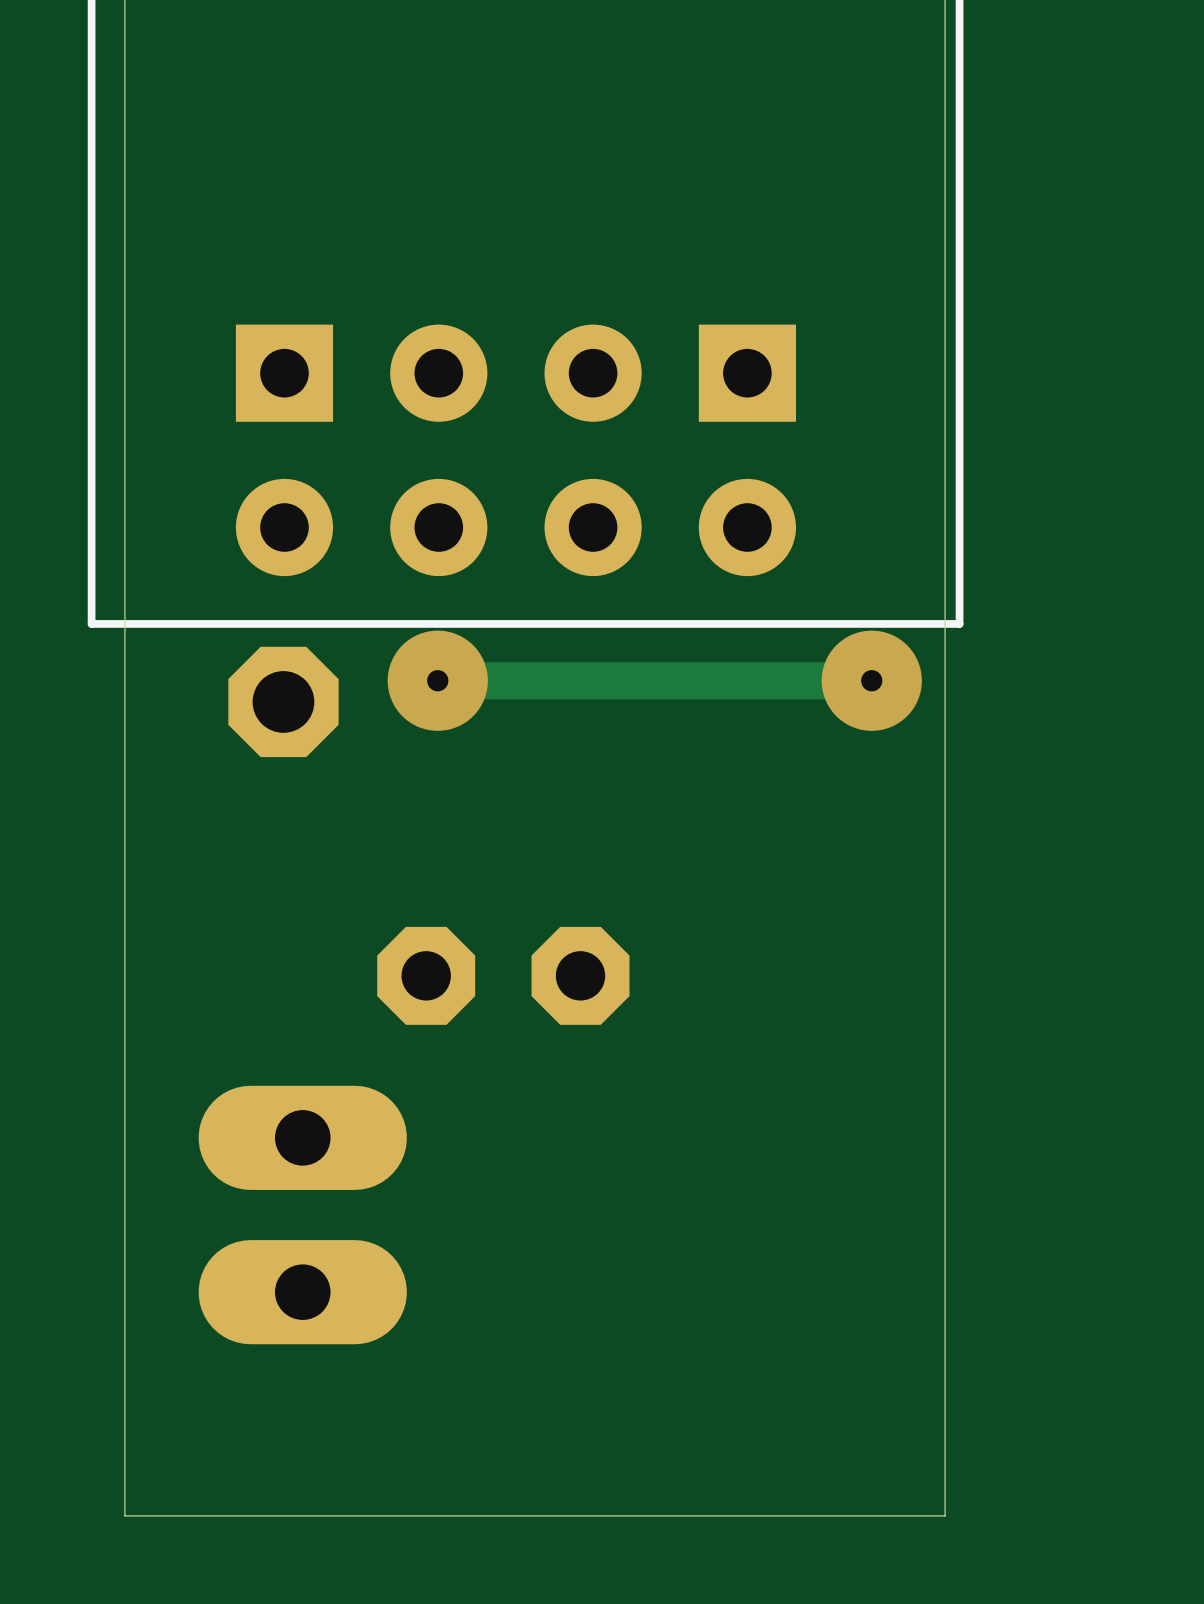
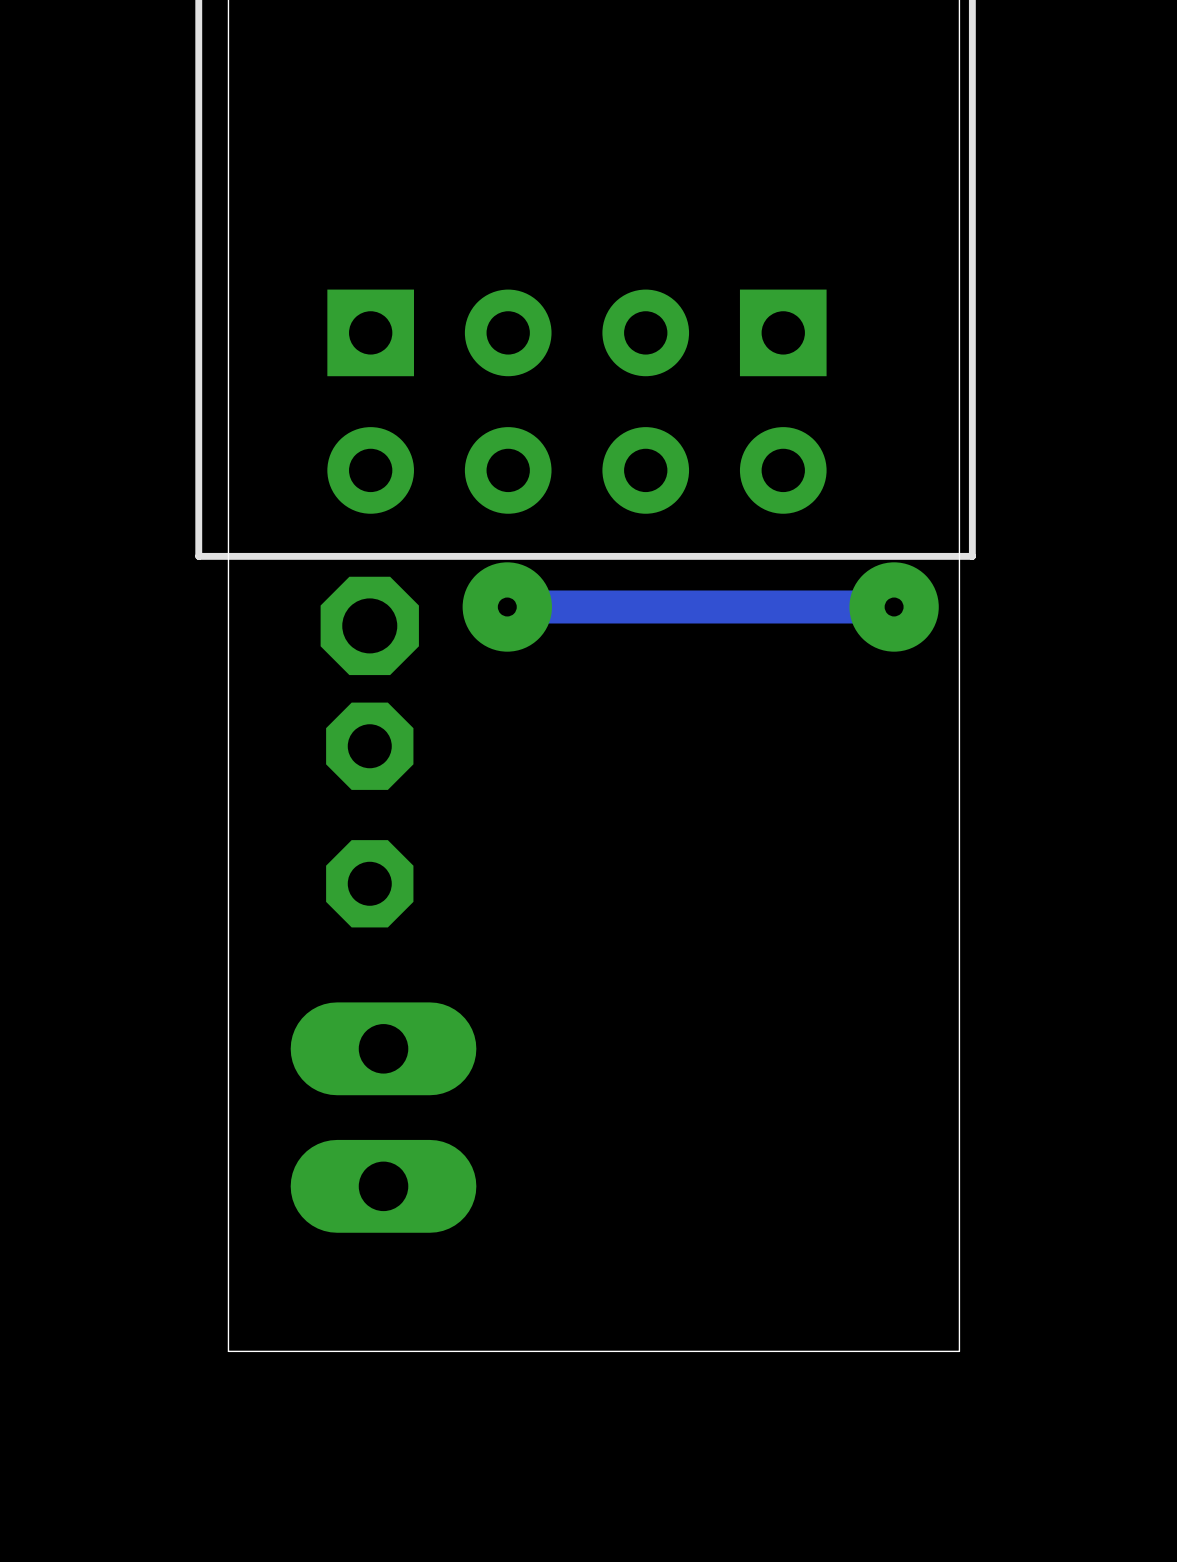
part rotation: 0° (503, 975) -> 90° clockwise (369, 815)
part position: (503, 975) -> (369, 815)
part position: (302, 1215) -> (383, 1117)

